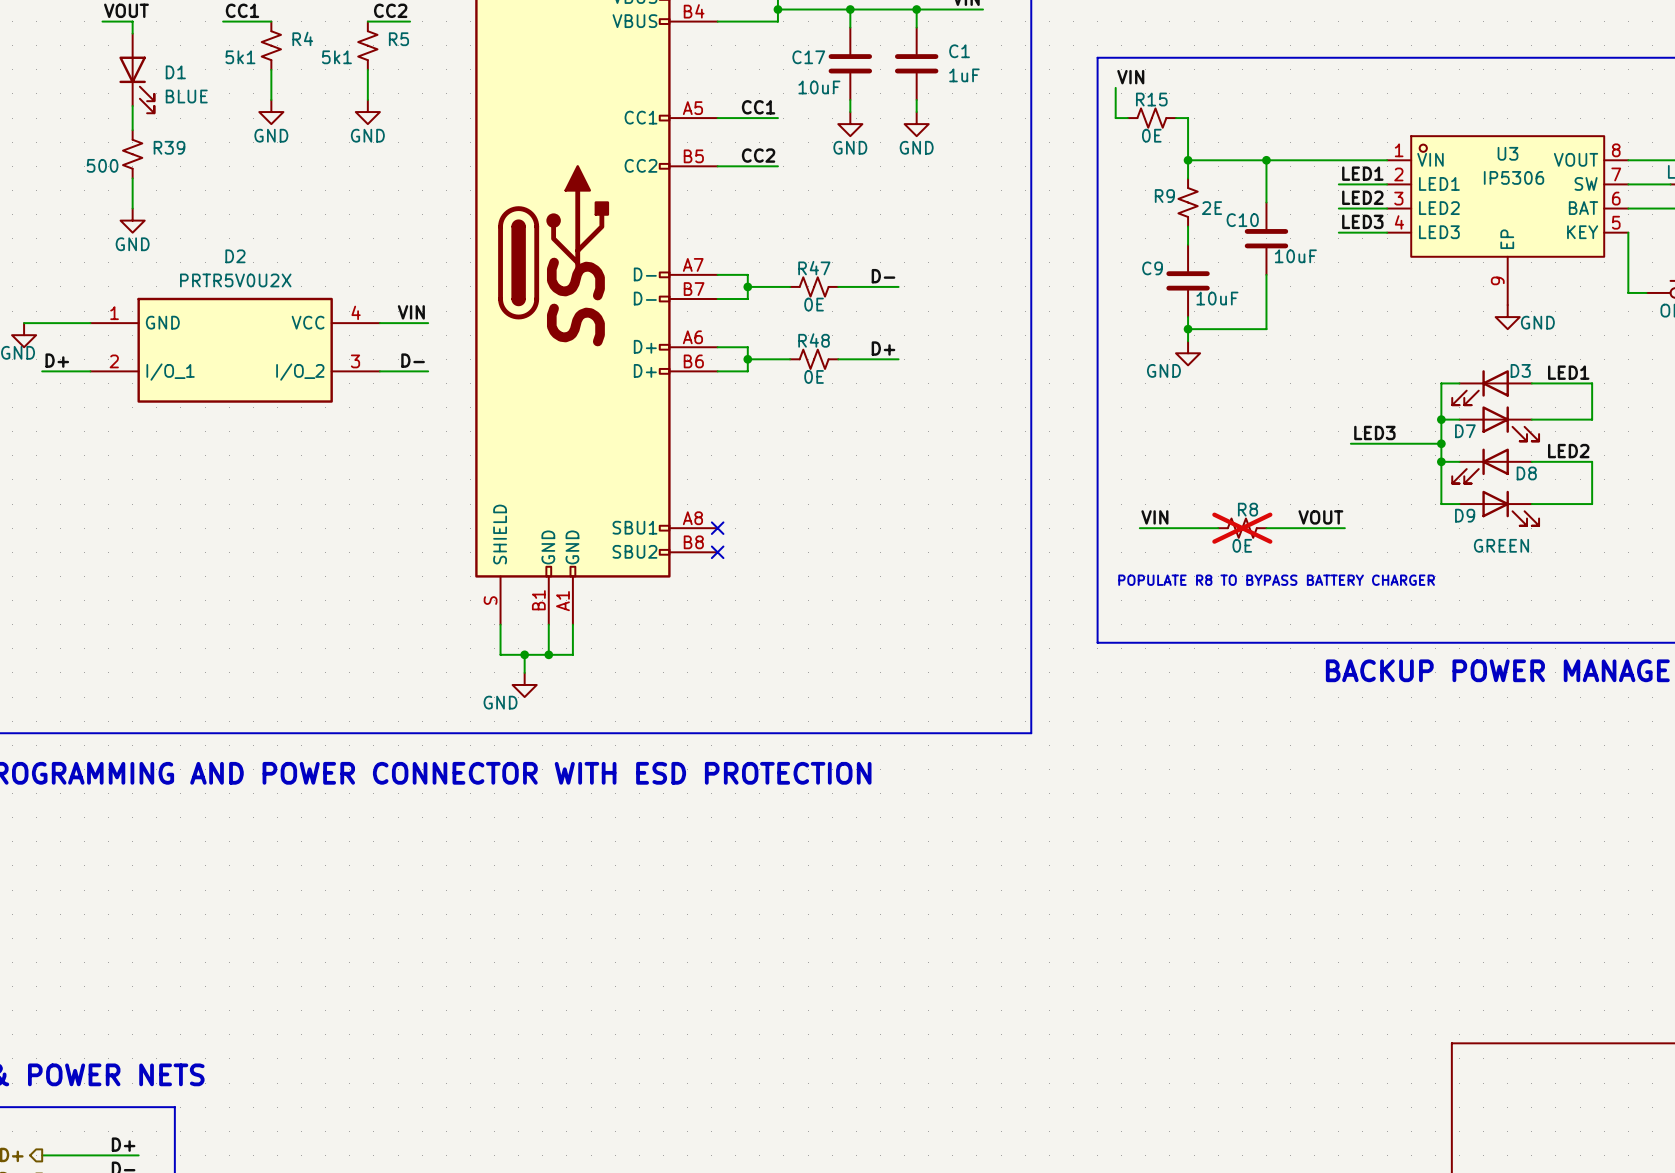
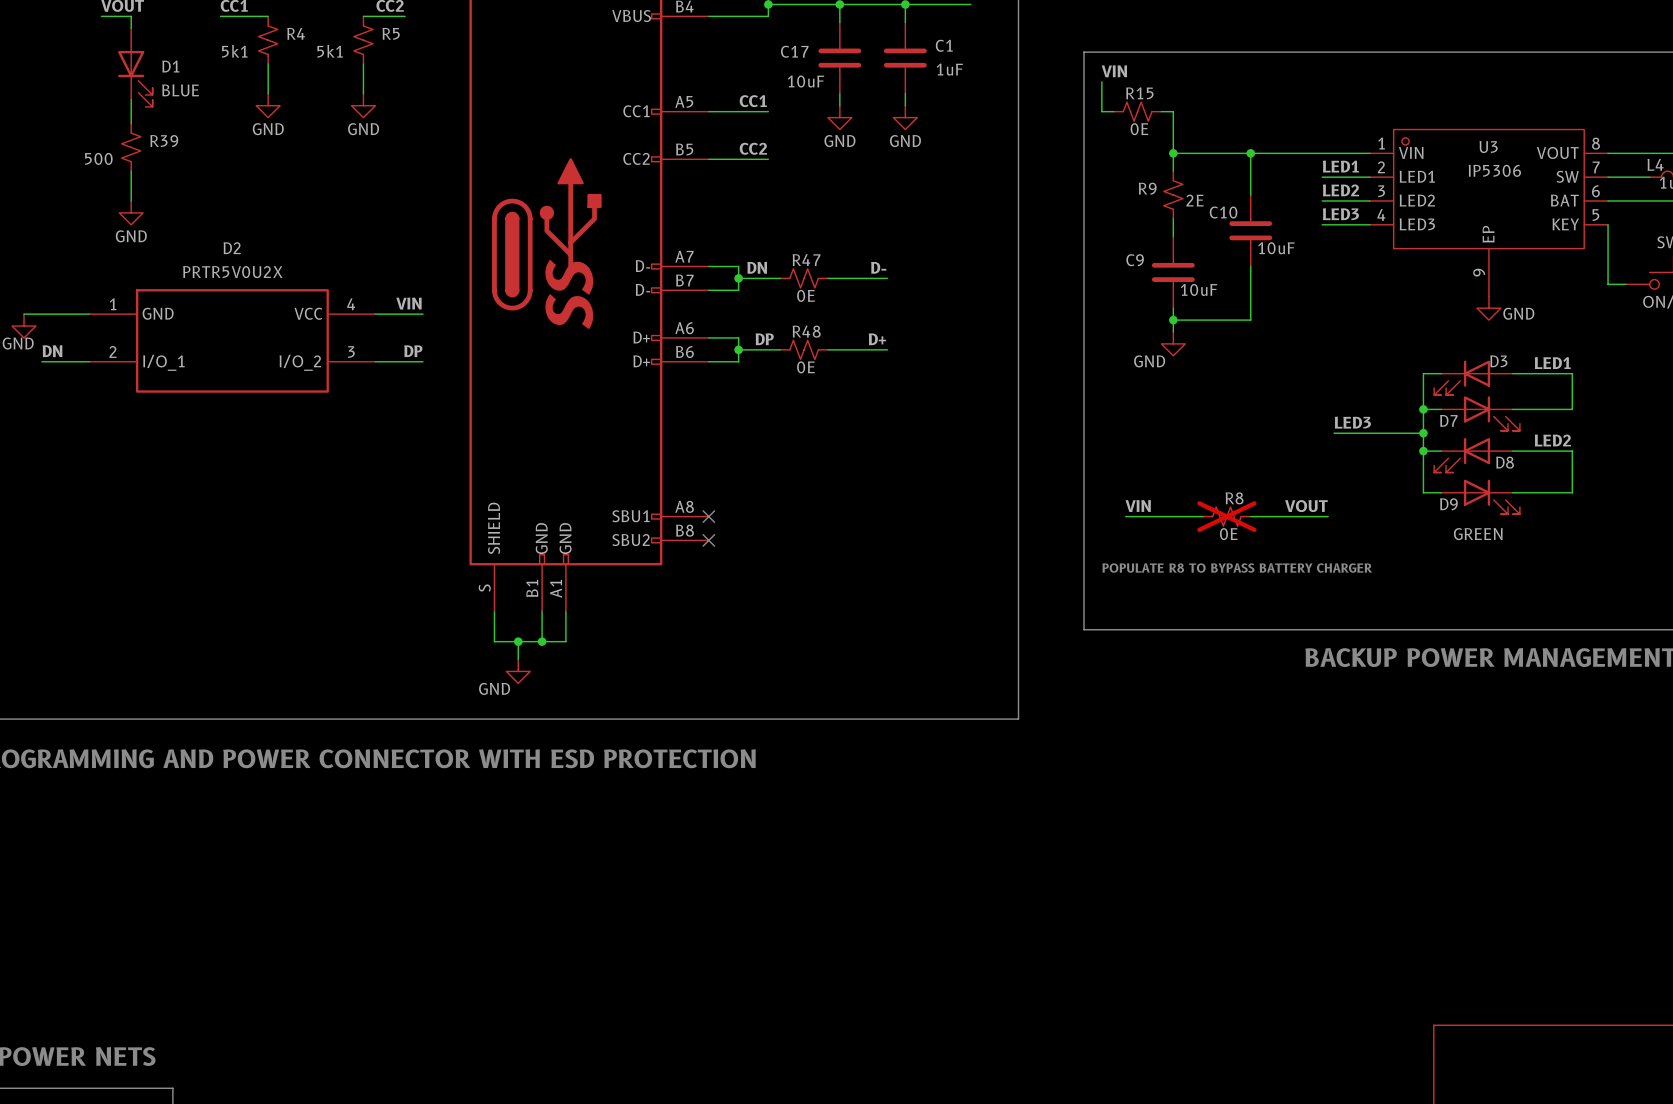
label: none -> DN (757, 267)
label: none -> DP (764, 339)
label: D+ (57, 360) -> DN (52, 351)
label: D- (413, 360) -> DP (413, 351)

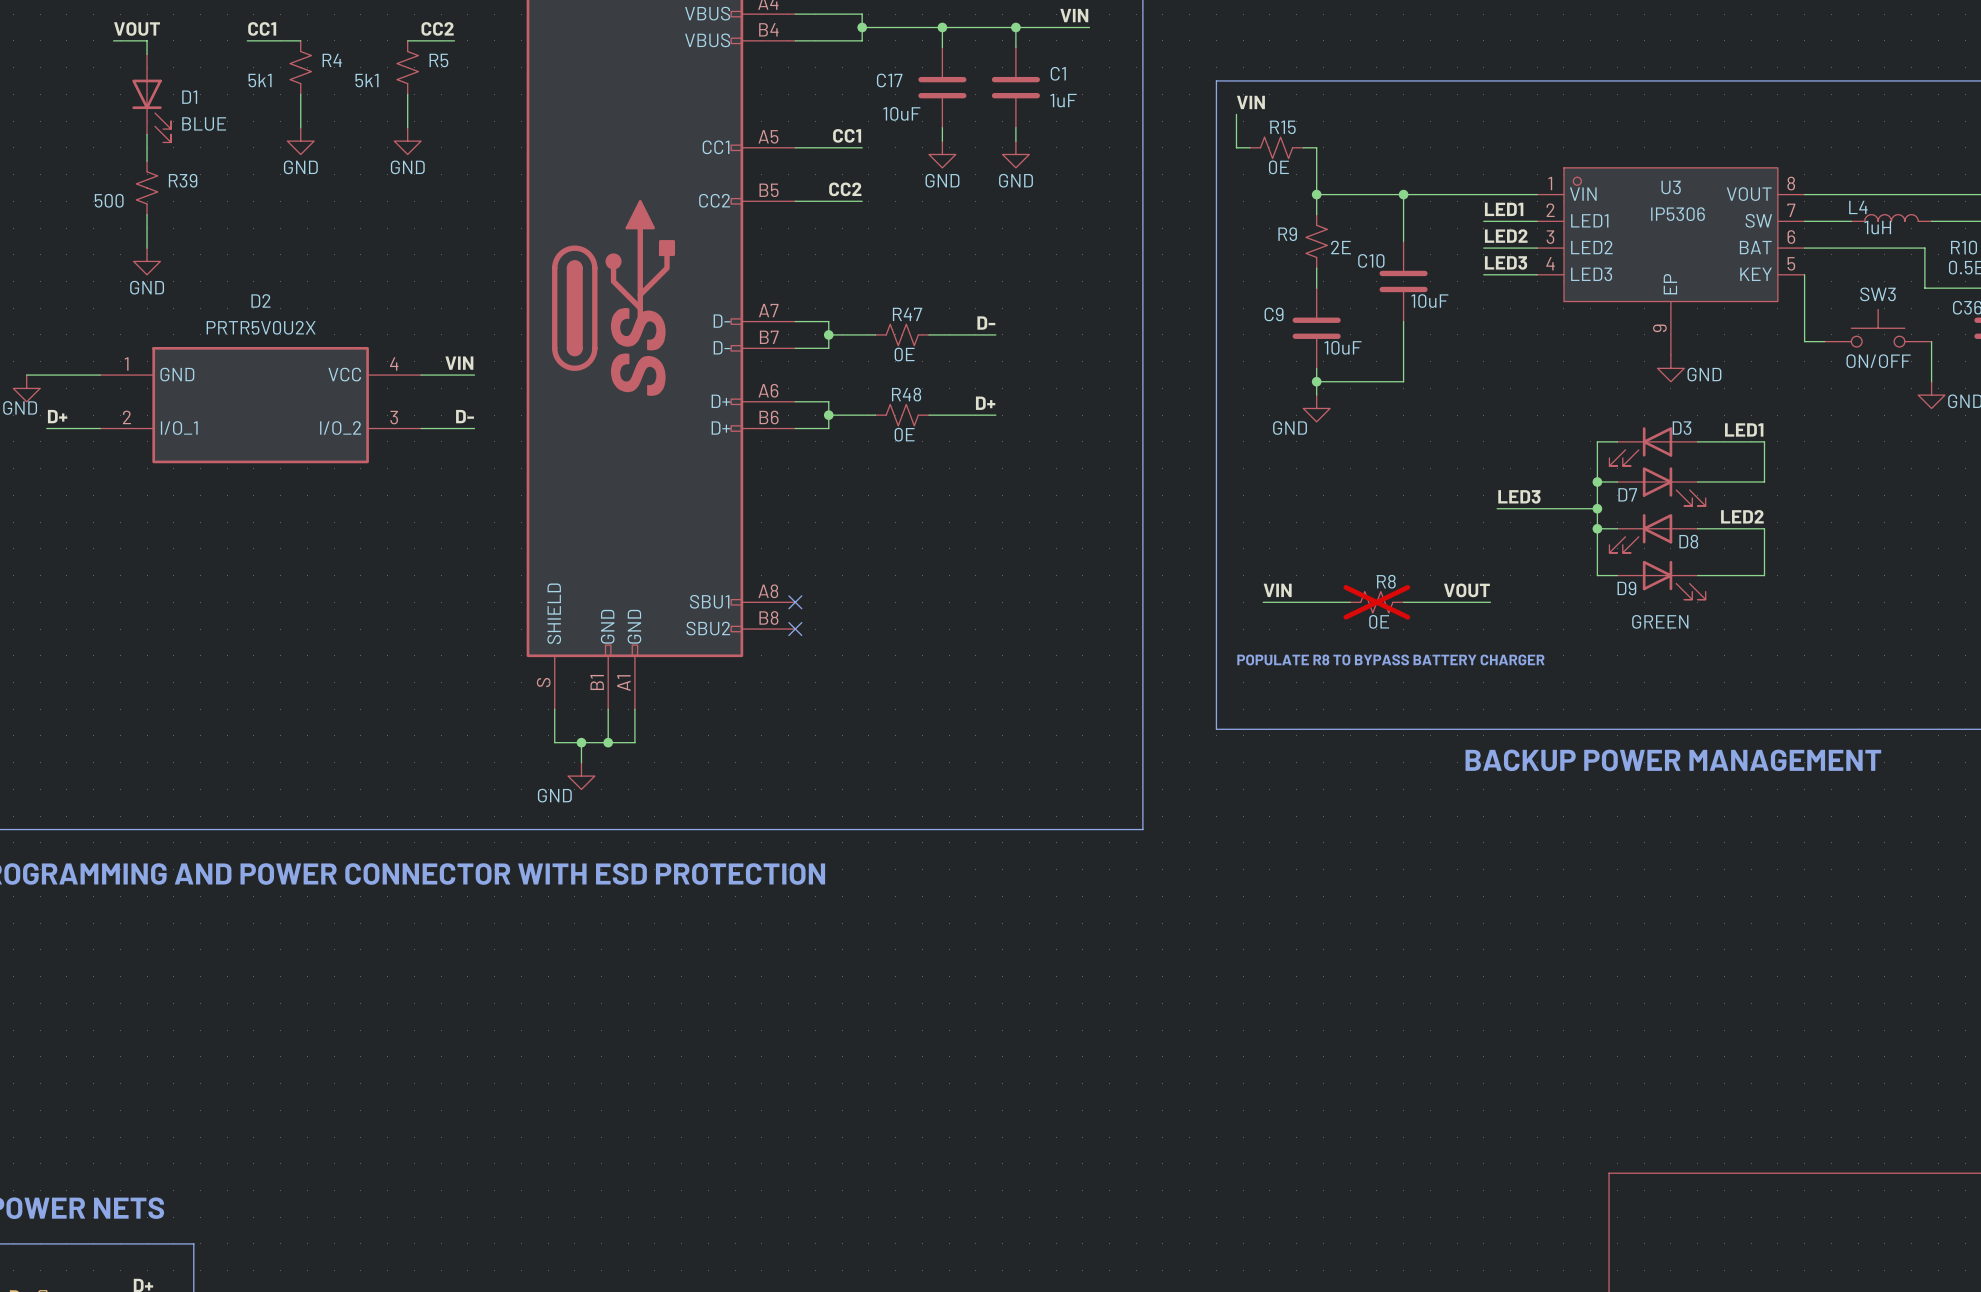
label: DN (757, 267) -> none
label: DP (764, 339) -> none
label: DN (52, 351) -> D+ (57, 416)
label: DP (413, 351) -> D- (465, 416)

